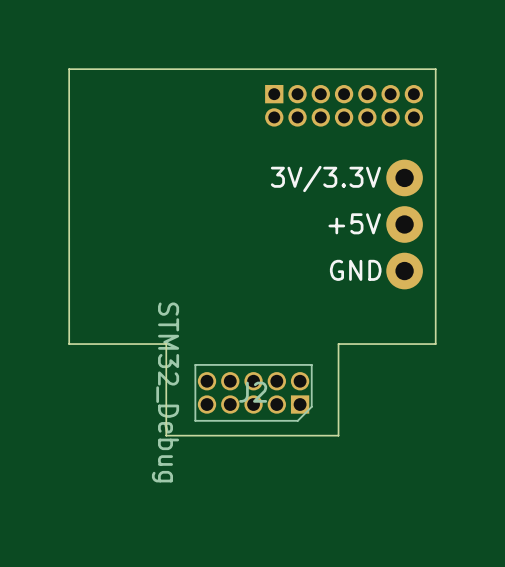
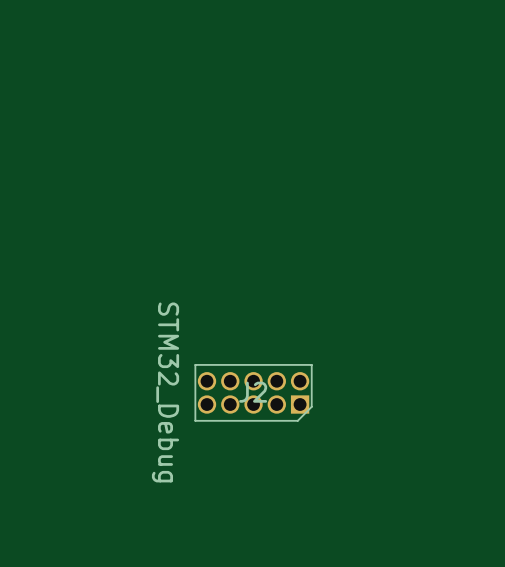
board edge: (435, 69) (435, 344) (338, 344) (338, 435) (166, 435) (166, 344) (69, 344) (69, 69) (435, 69) -> none
part: (344, 105) -> none
part: (404, 177) -> none
text: 3V/3.3V (325, 179) -> none
text: +5V (354, 223) -> none
part: (404, 224) -> none
text: GND (355, 270) -> none
part: (404, 271) -> none

